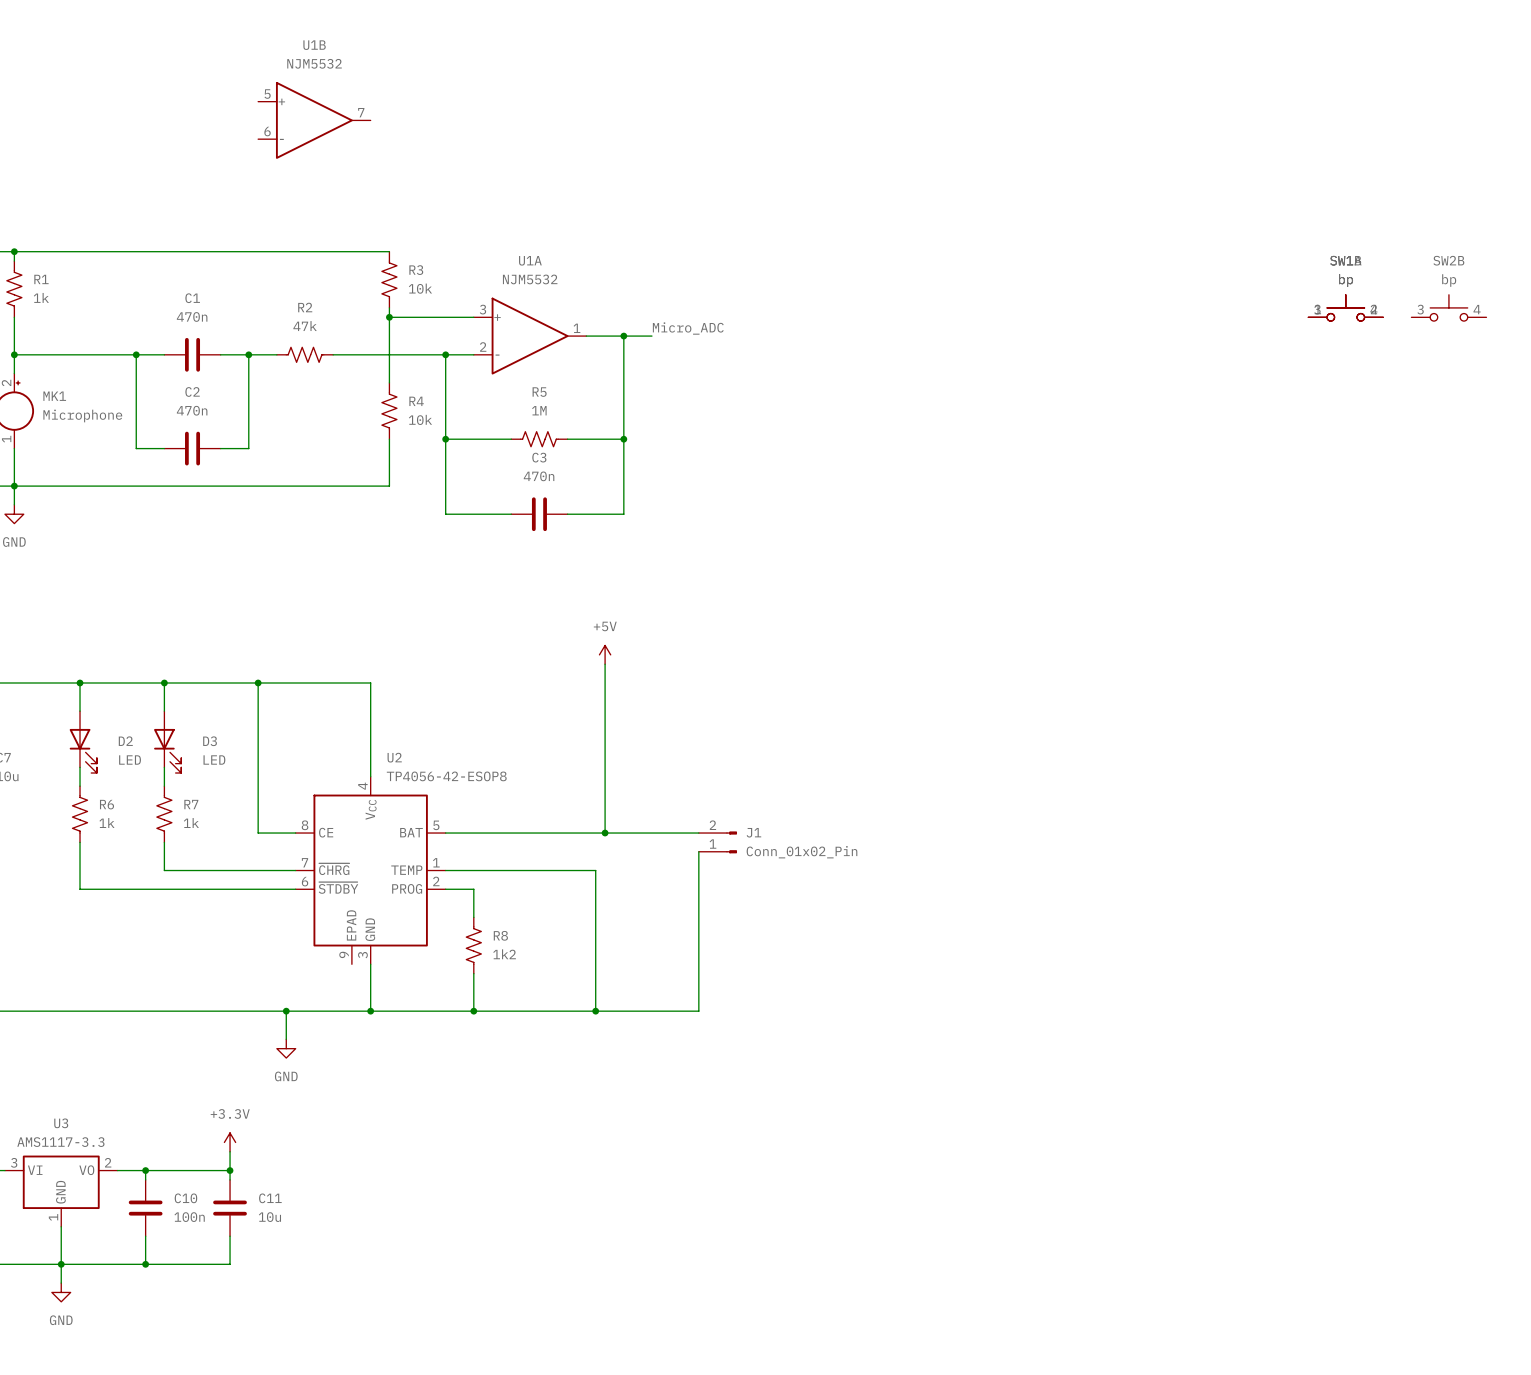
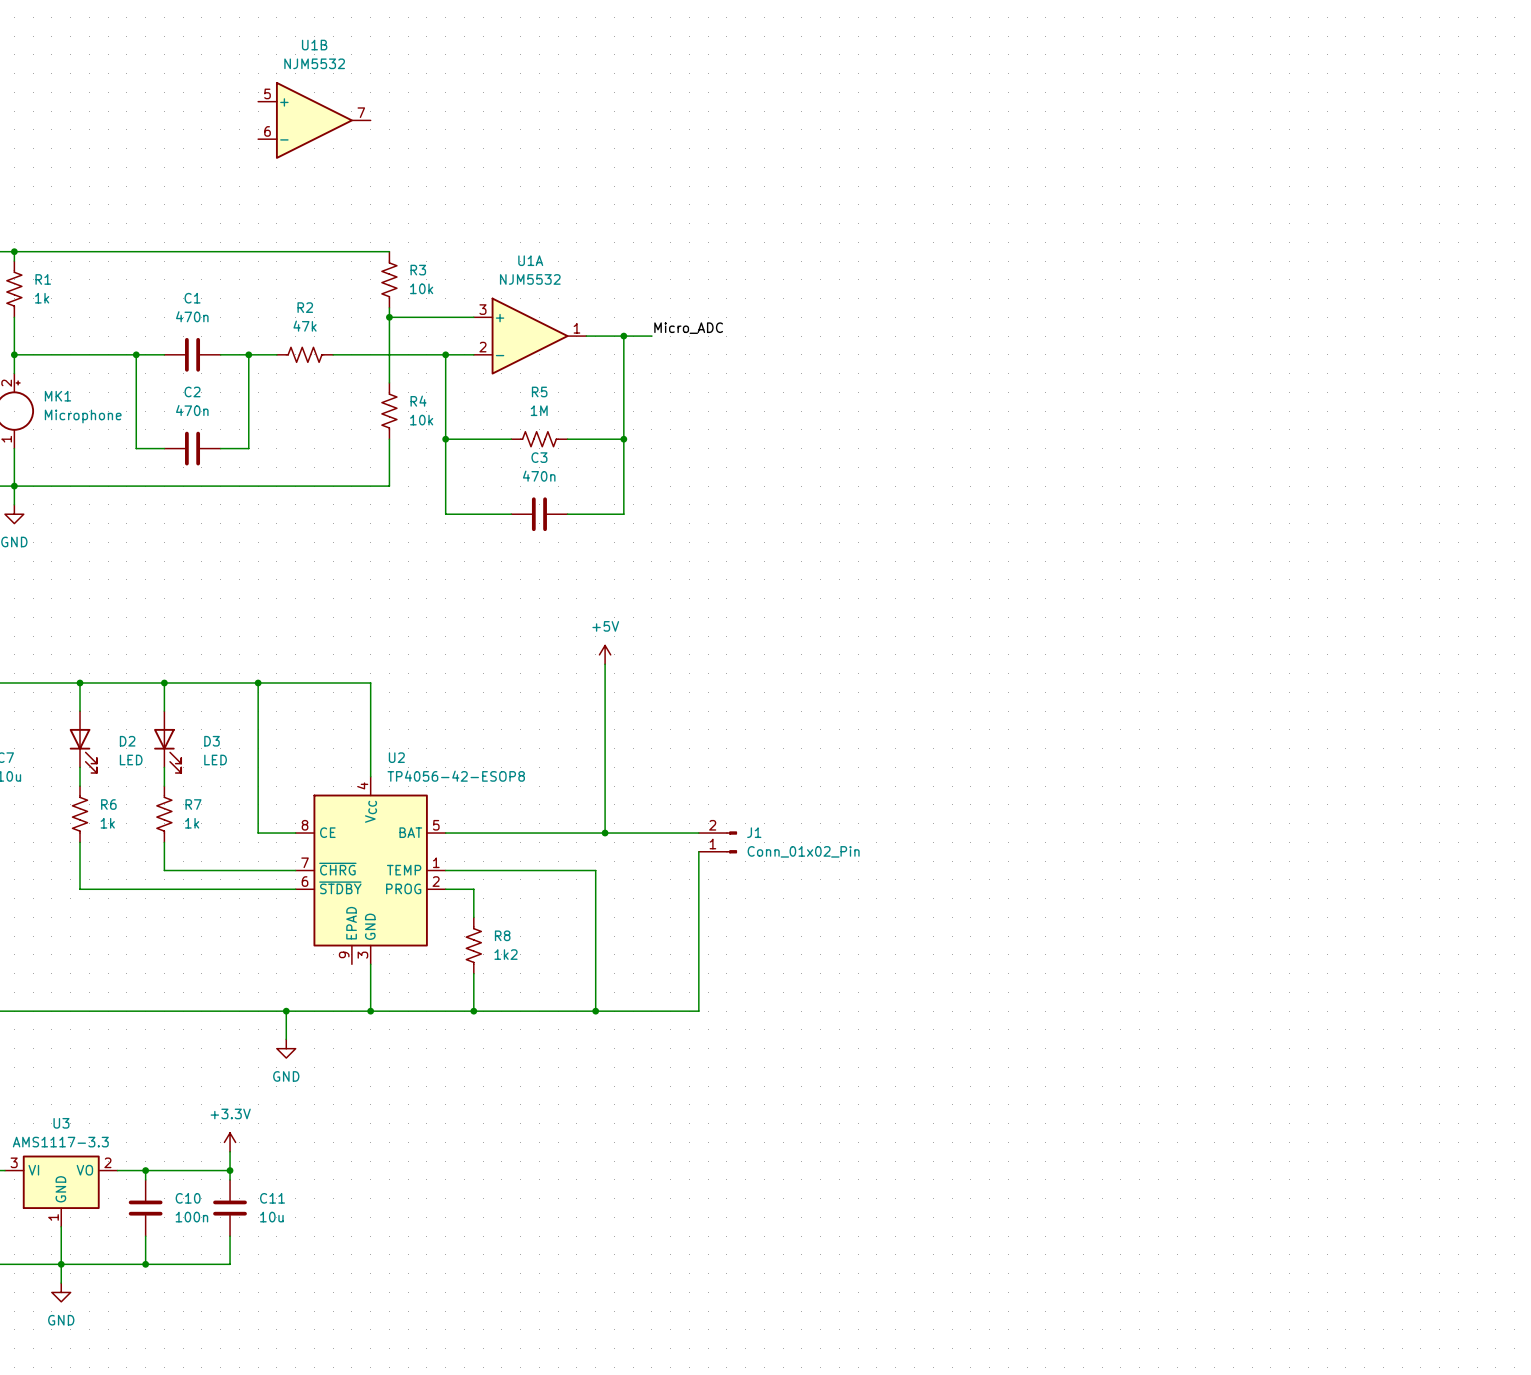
part: bp (1345, 307) -> none
part: bp (1345, 307) -> none
SW2B: bp (1448, 307) -> none

